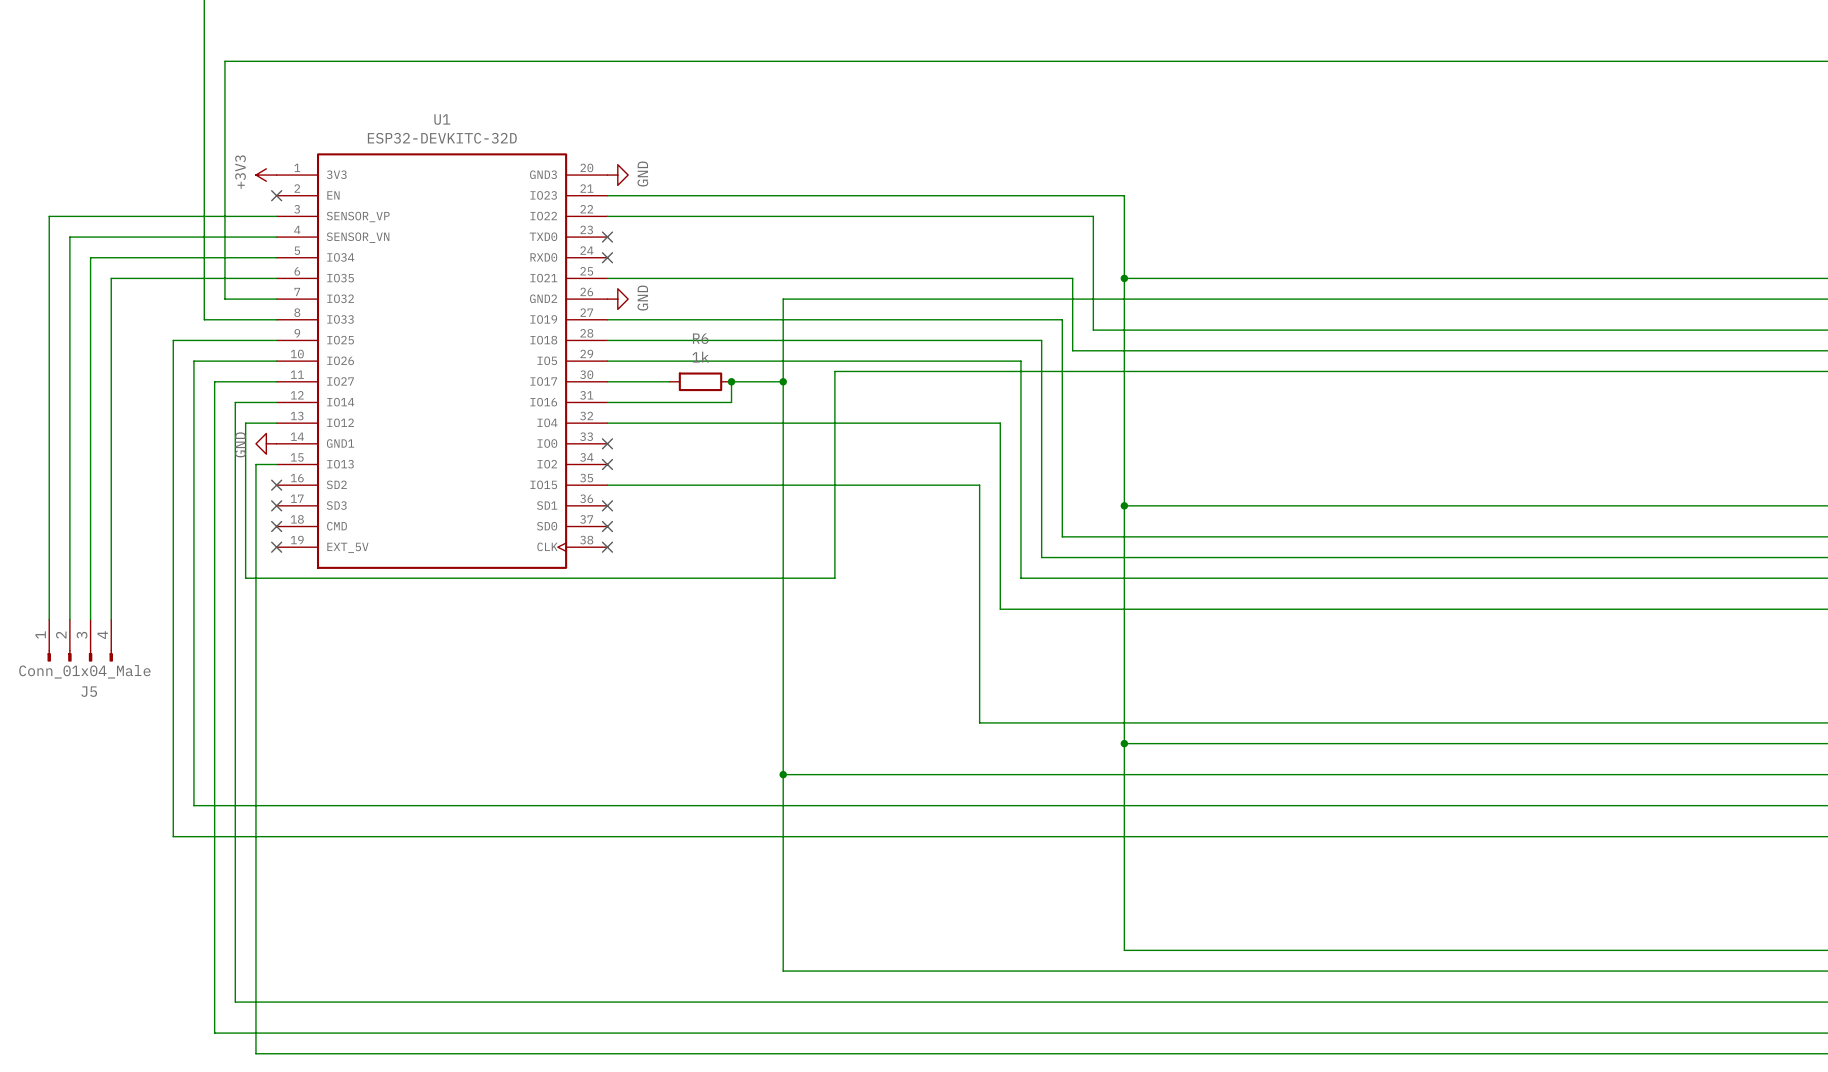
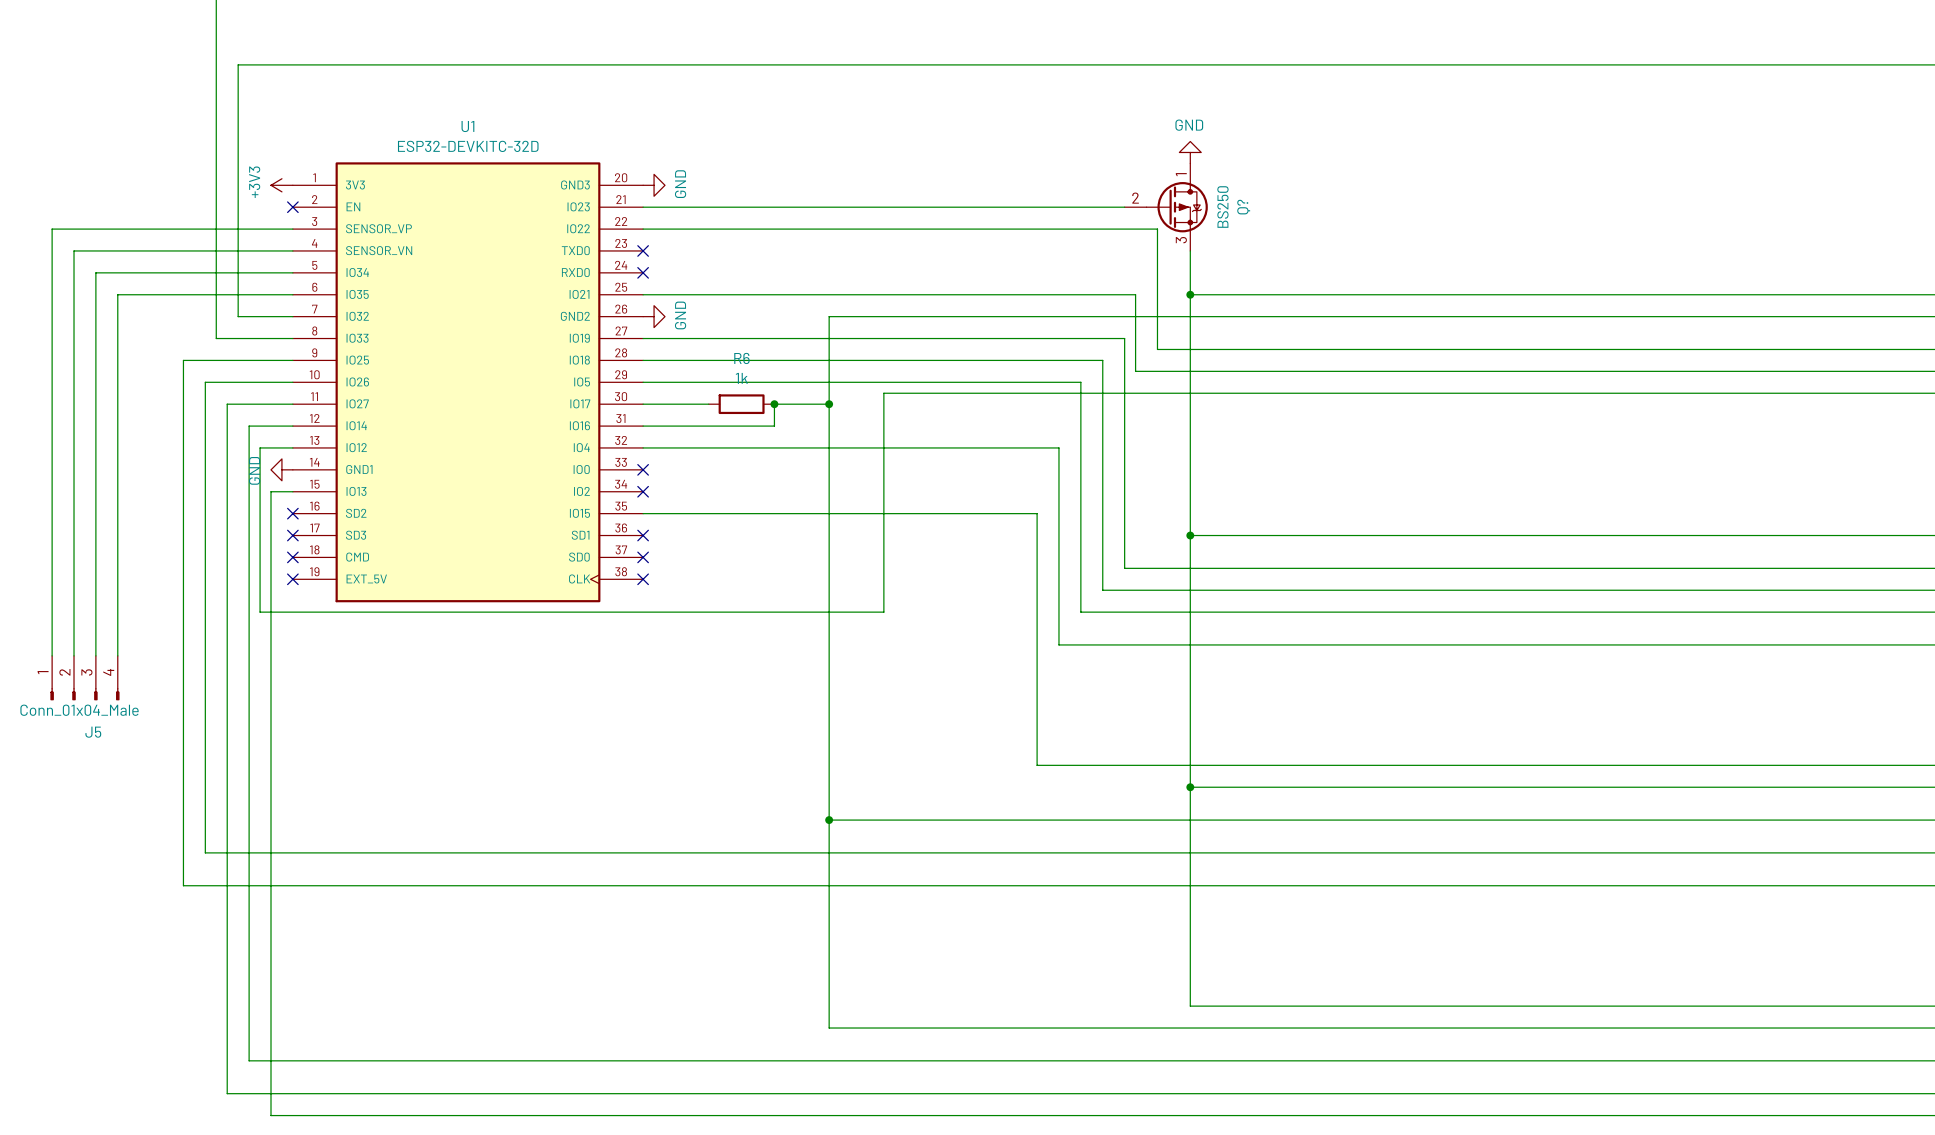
power symbol: none -> GND (1190, 152)
Q?: none -> BS250 (1166, 207)

